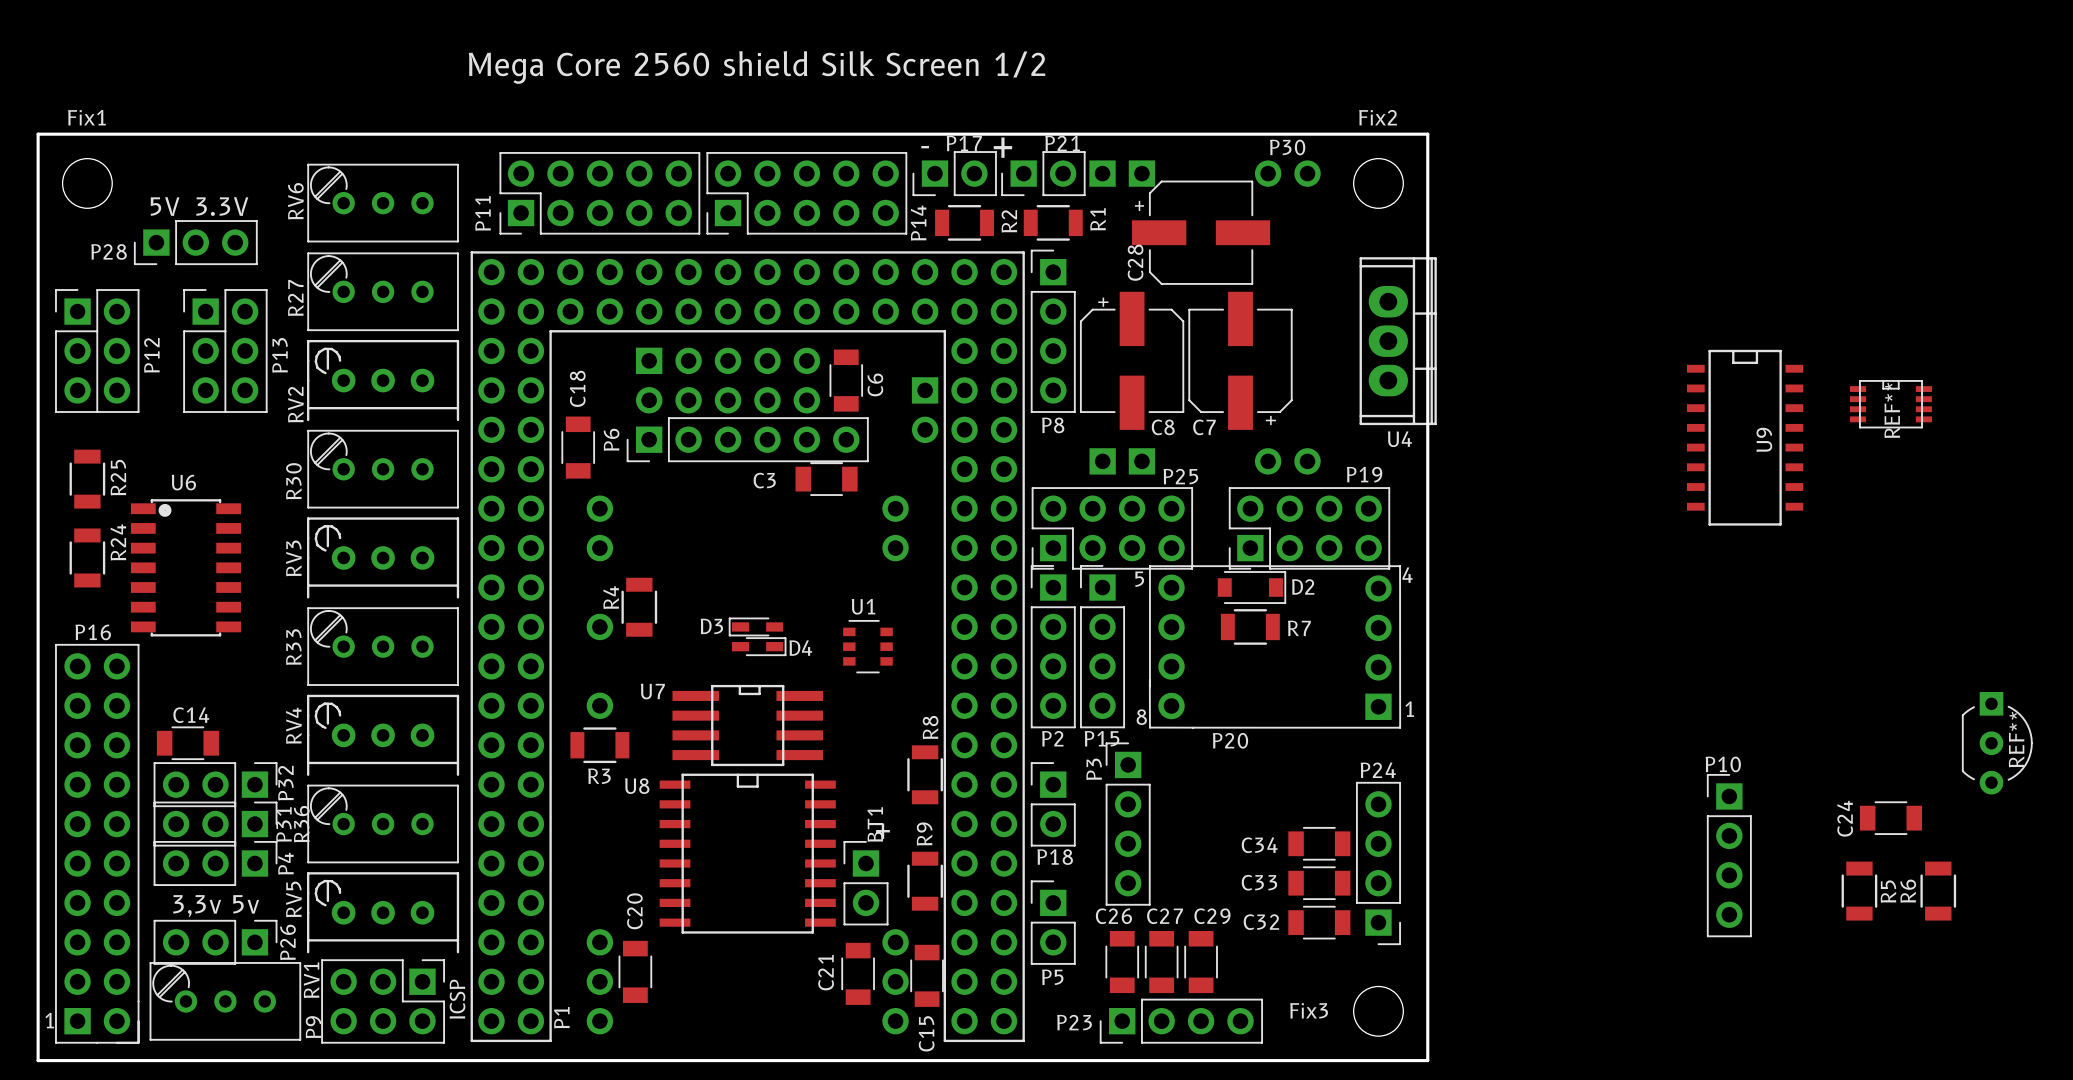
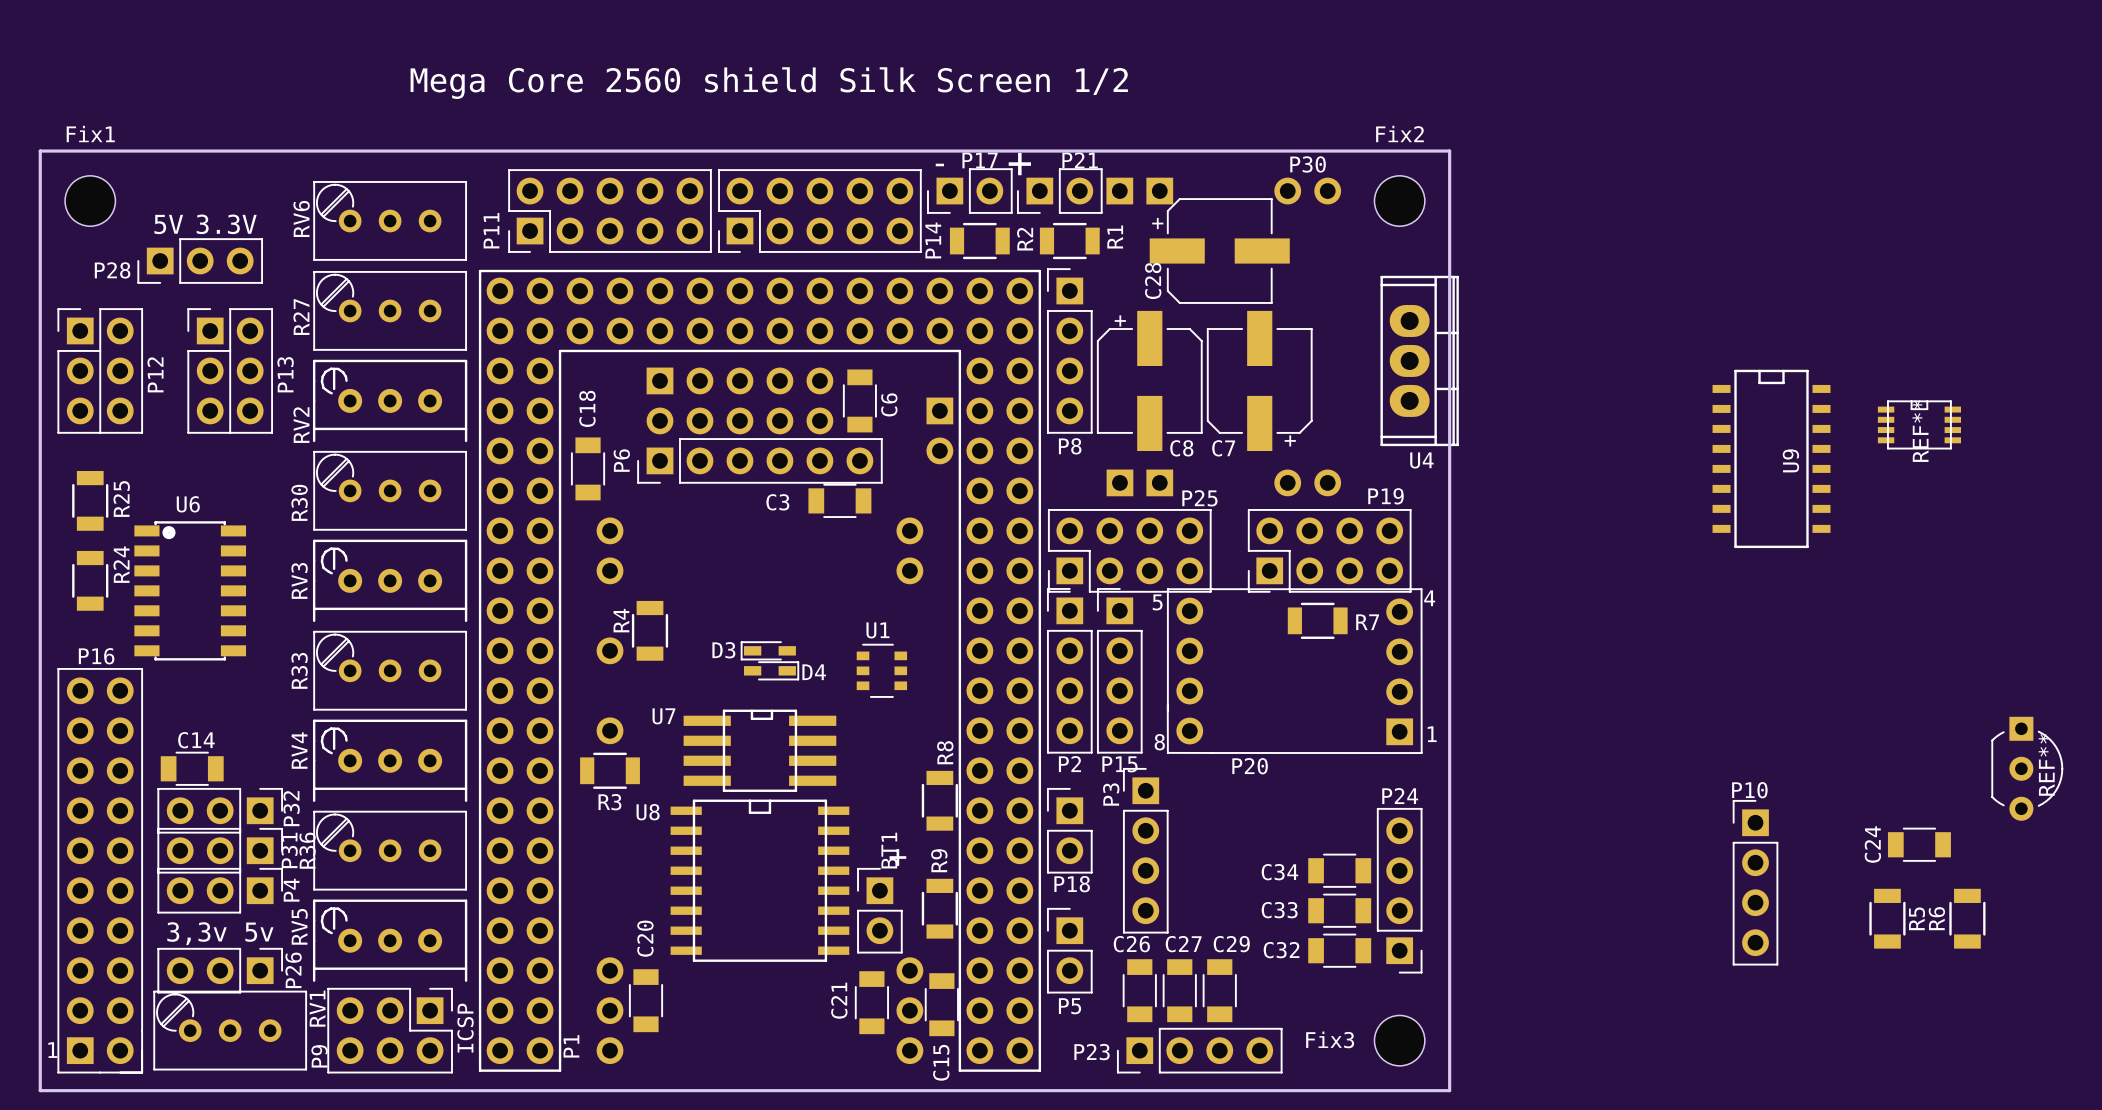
D2: (1251, 587) -> none
R7 position: (1250, 626) -> (1317, 620)

